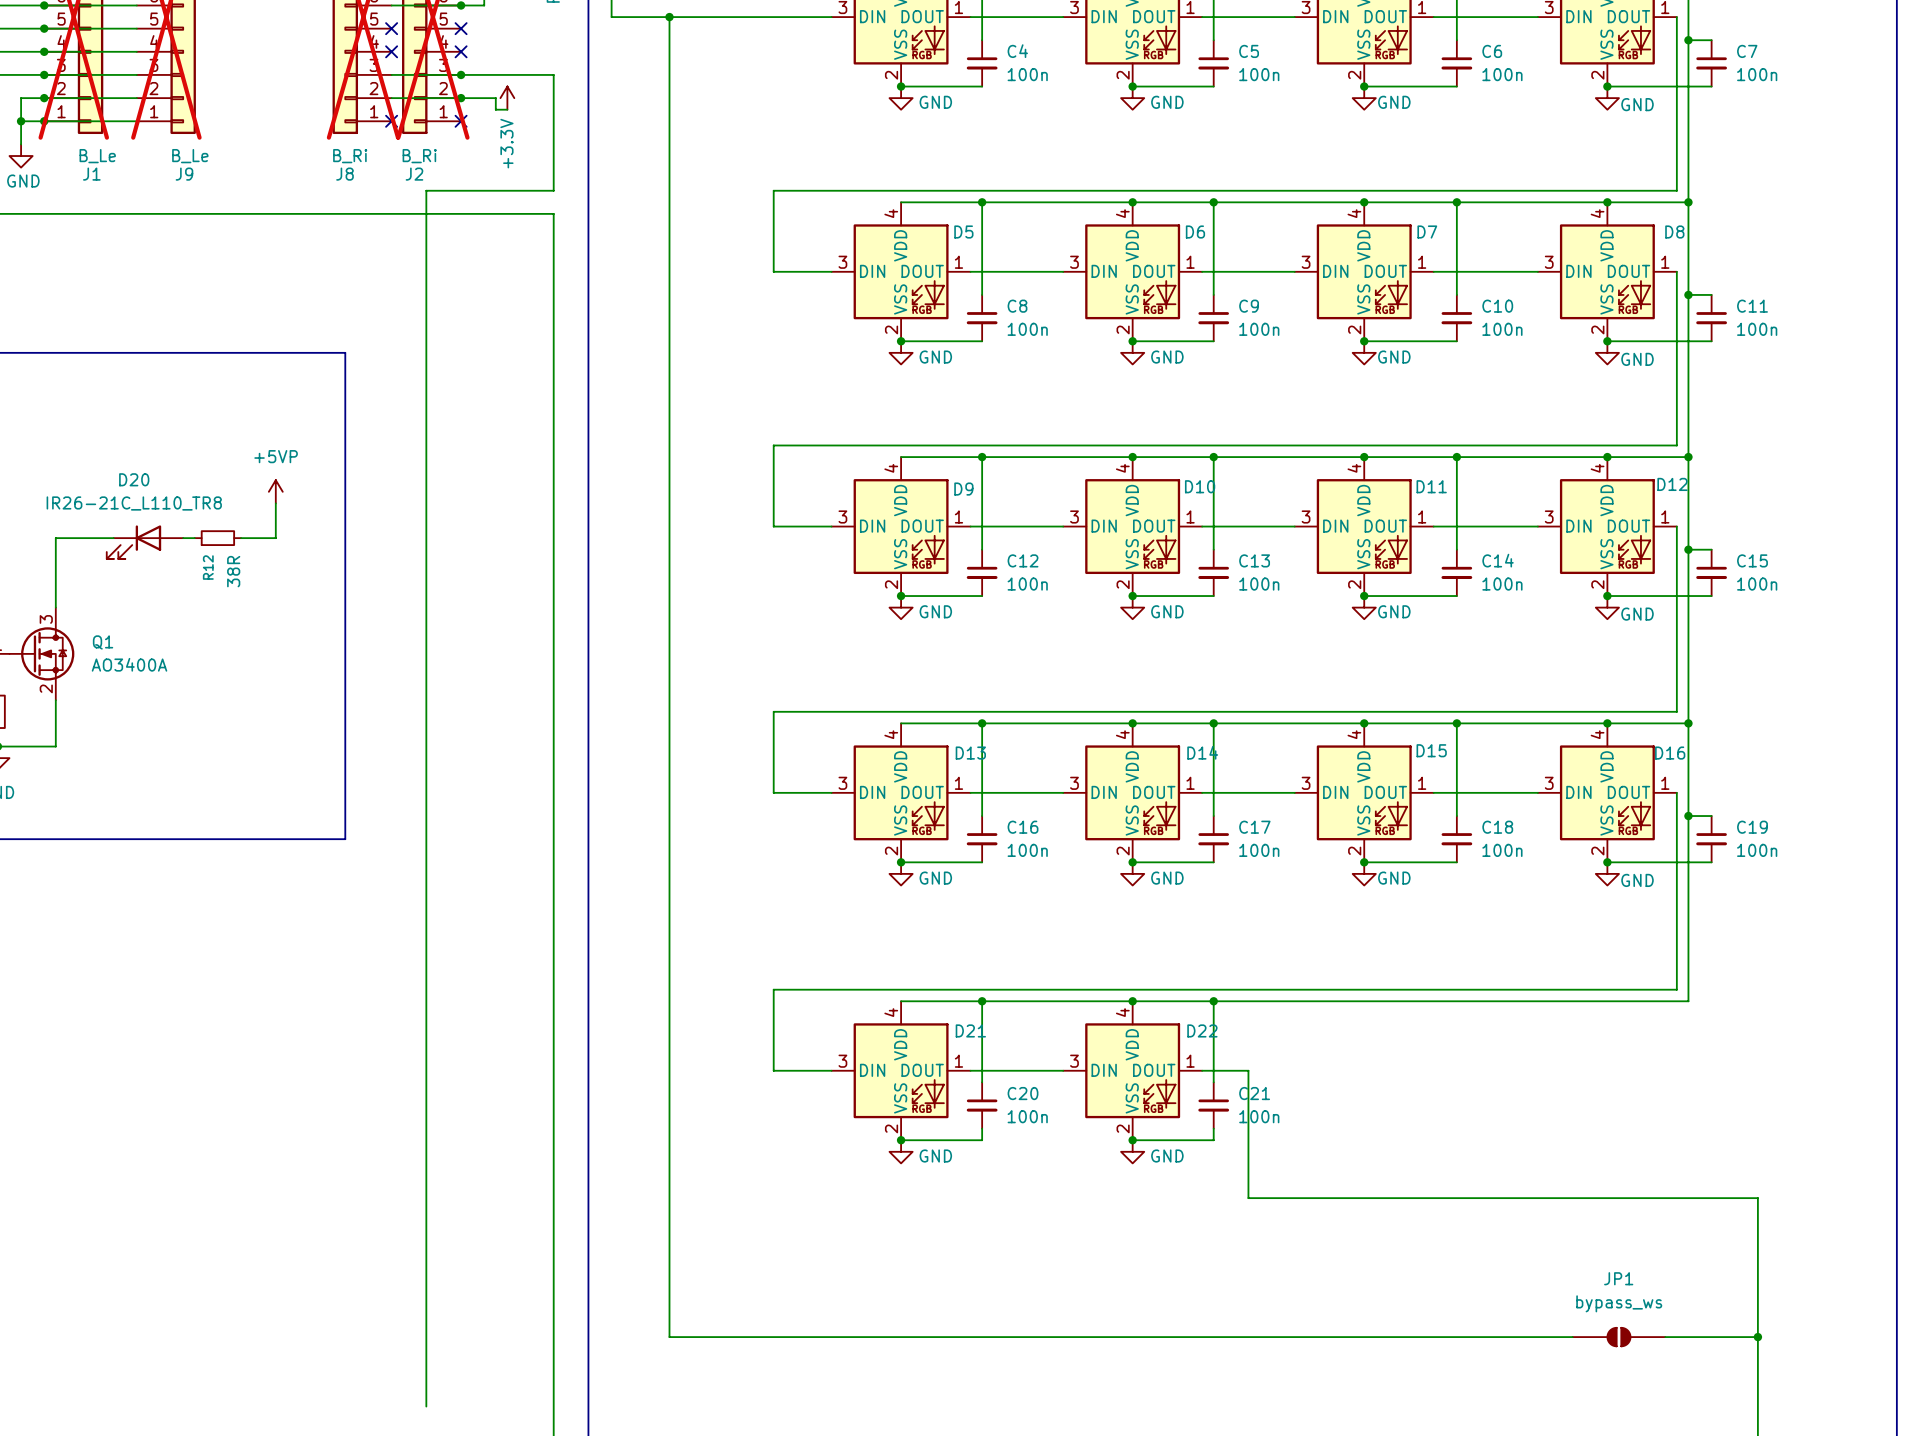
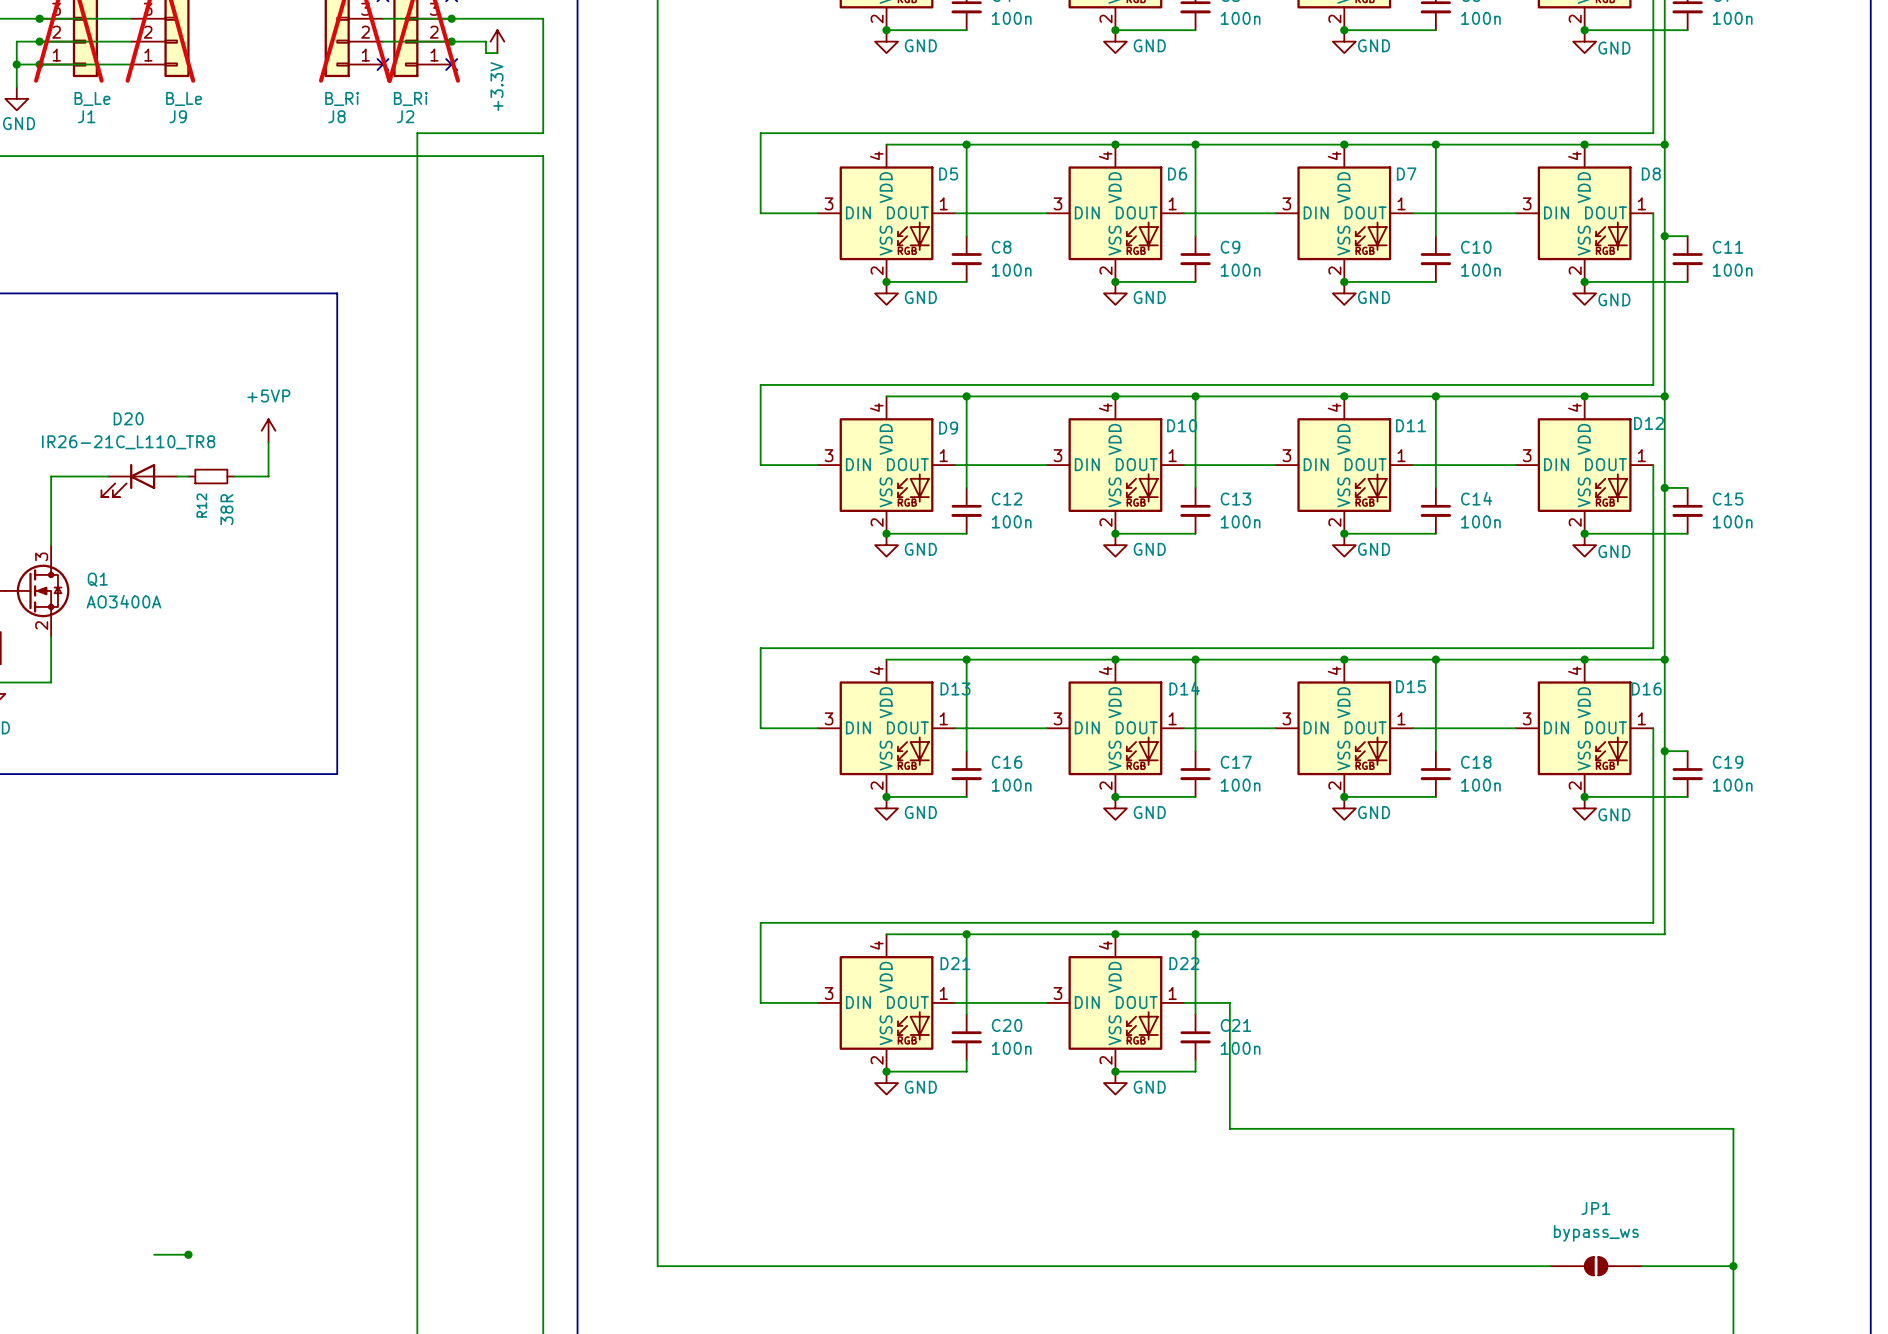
wire: none -> (154, 1254) (188, 1254)
junction: none -> (188, 1254)

